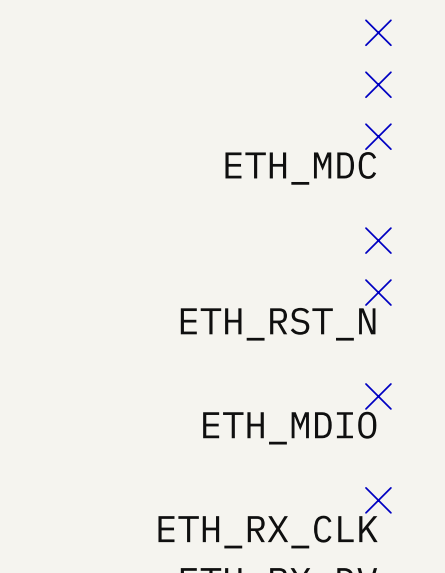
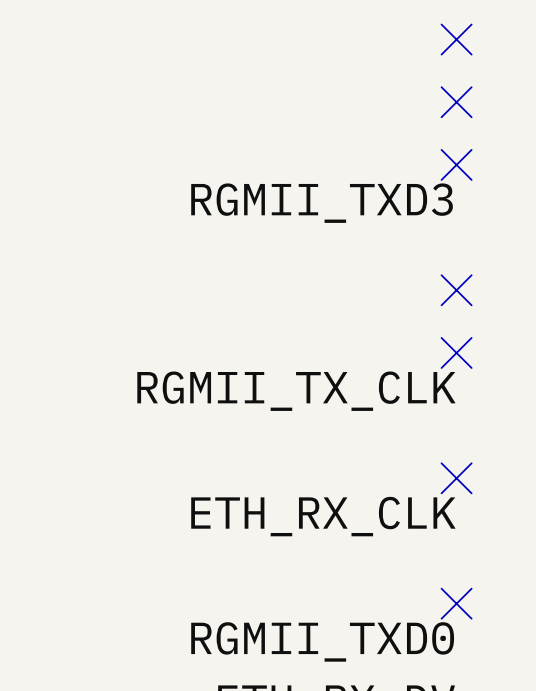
label: ETH_MDC (300, 168) -> RGMII_TXD3 (322, 203)
label: ETH_RST_N (278, 324) -> RGMII_TX_CLK (296, 391)
label: ETH_MDIO (289, 428) -> ETH_RX_CLK (323, 516)
label: ETH_RX_CLK (268, 532) -> RGMII_TXD0 (322, 641)

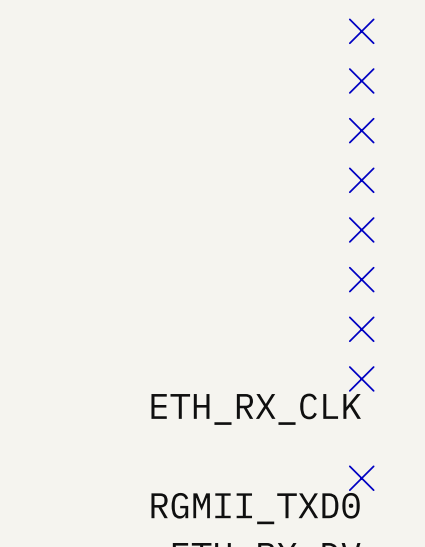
label: RGMII_TXD3 (322, 203) -> none
no-connect mark: none -> (361, 180)
label: RGMII_TX_CLK (296, 391) -> none
no-connect mark: none -> (361, 329)

